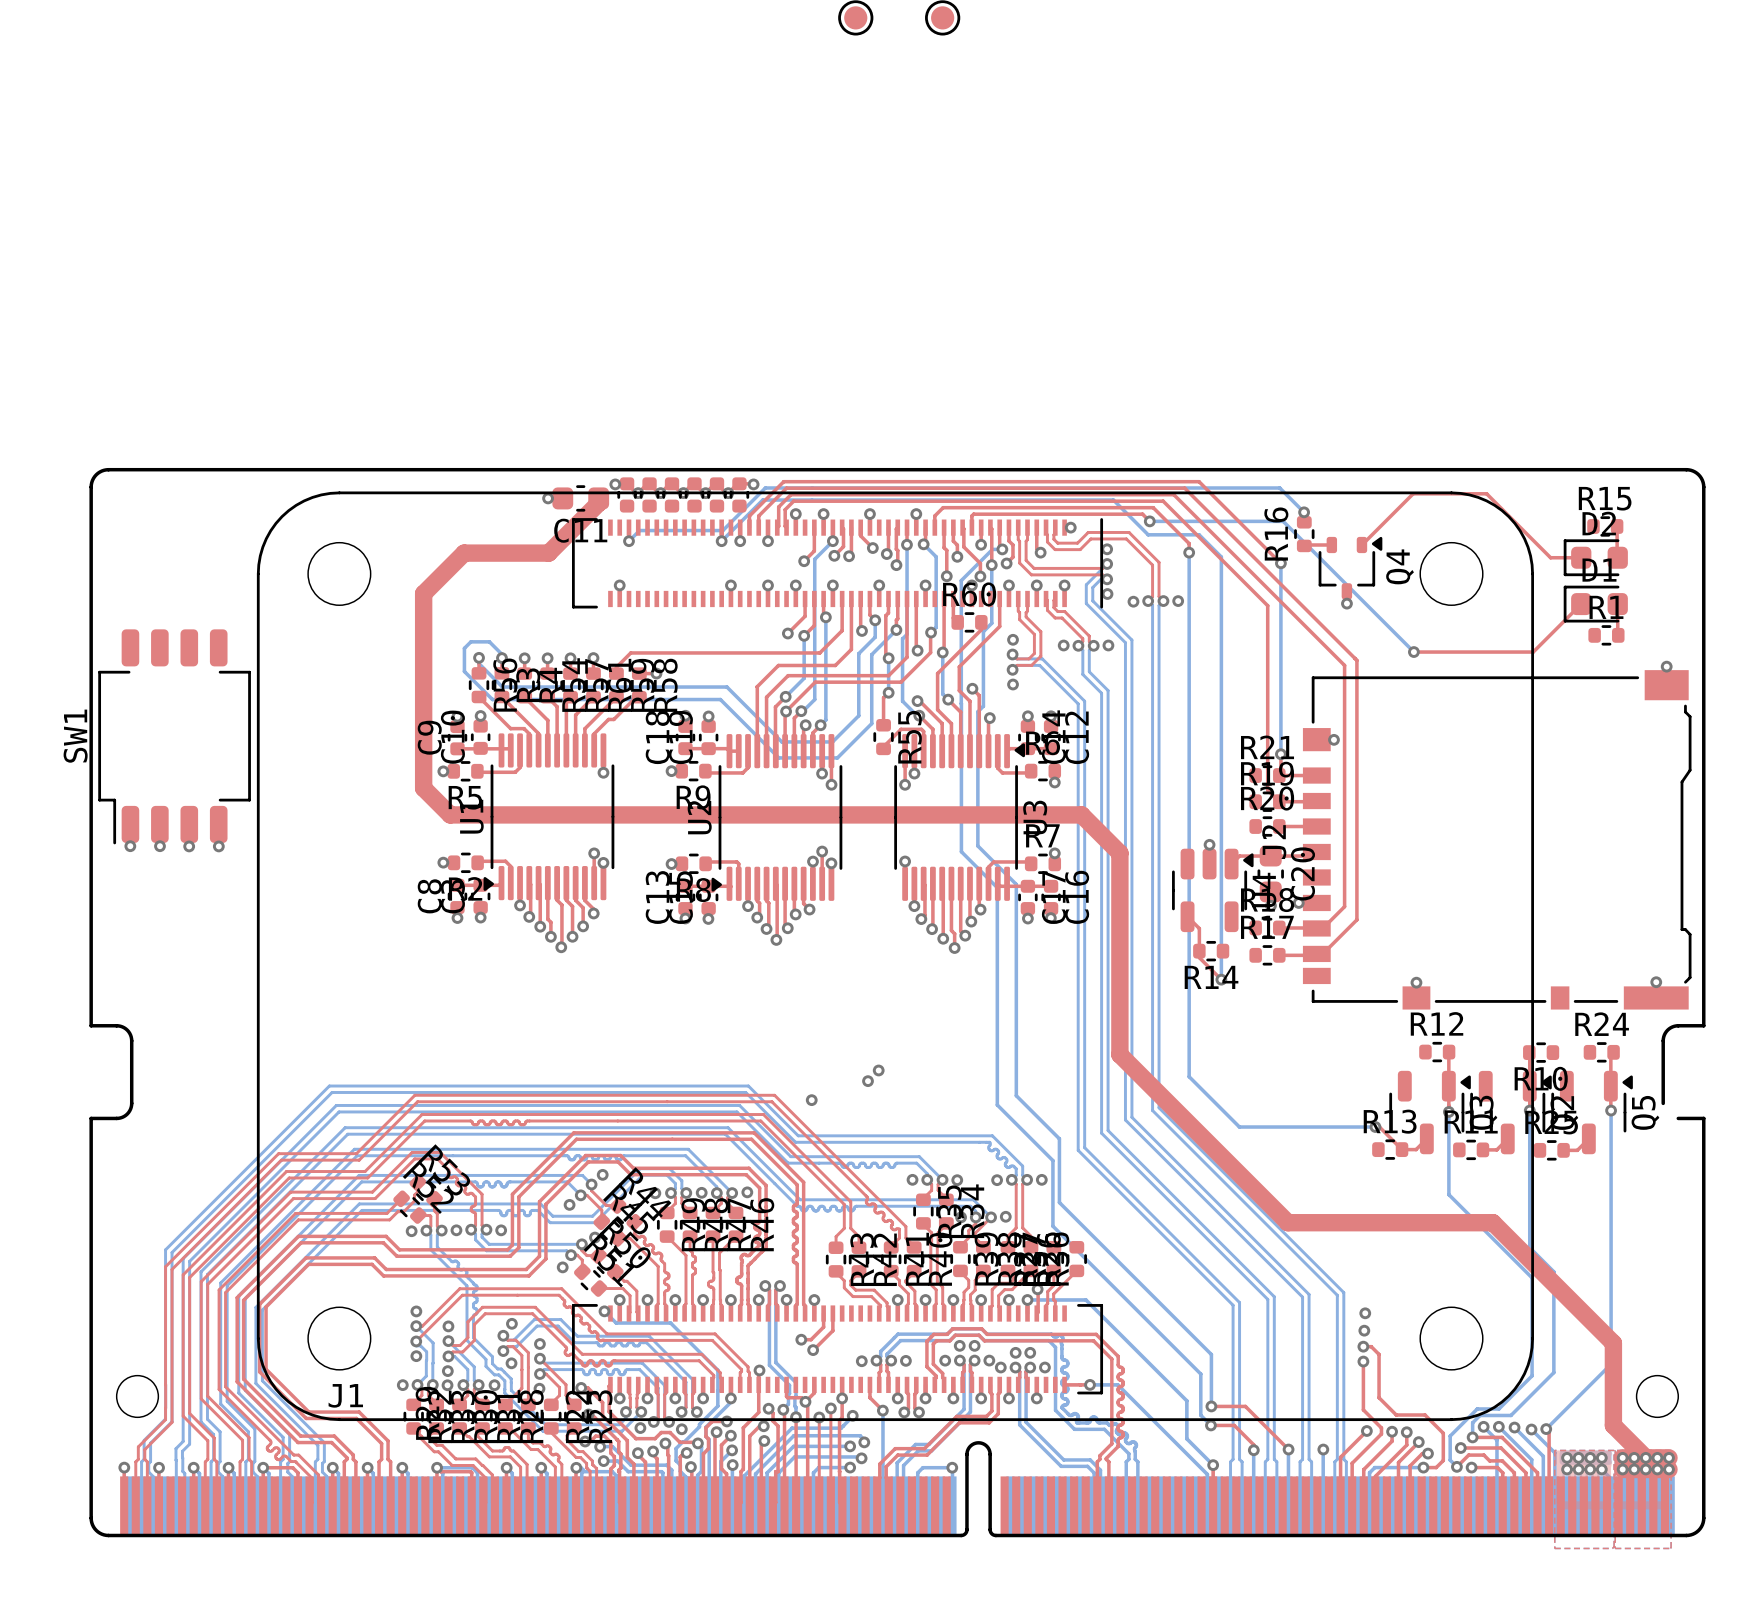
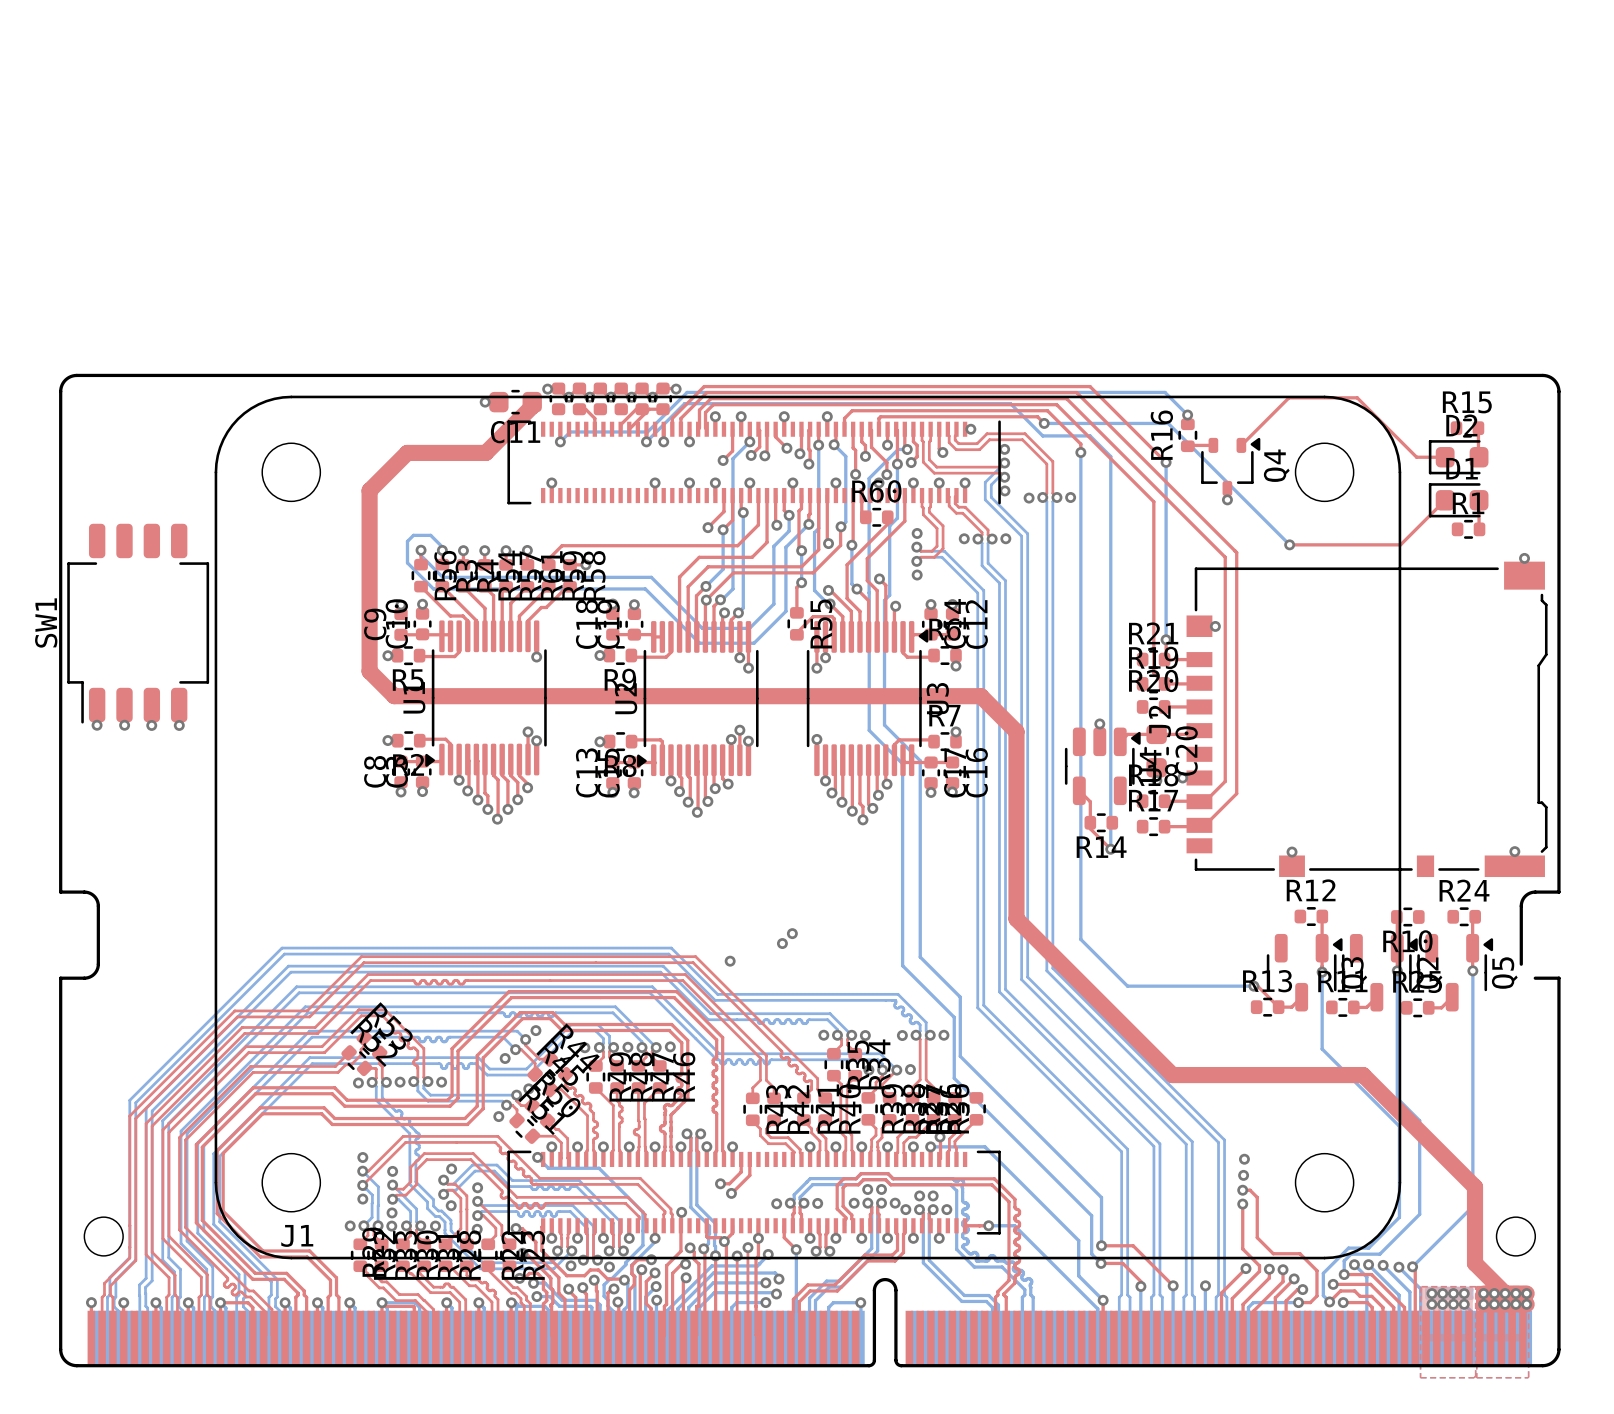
top track: none -> (579, 409) (585, 409) (594, 418) (594, 429)
top track: none -> (642, 409) (636, 409) (620, 424) (620, 429)
top track: none -> (663, 409) (649, 409) (629, 429)

